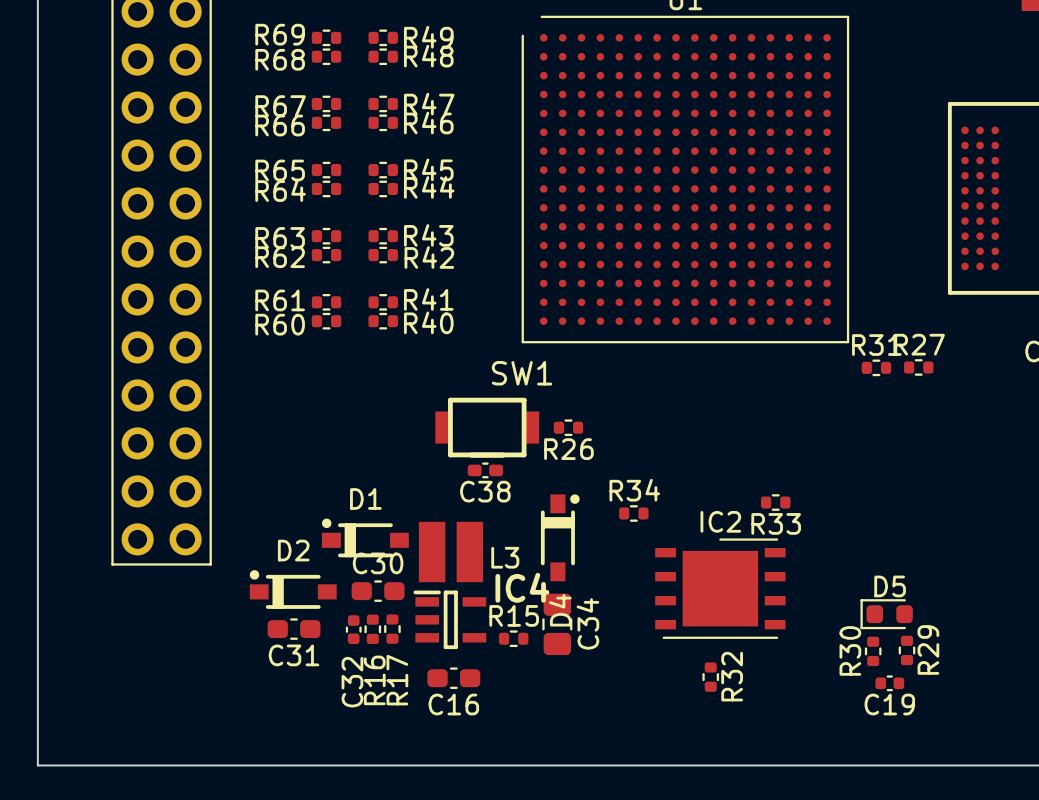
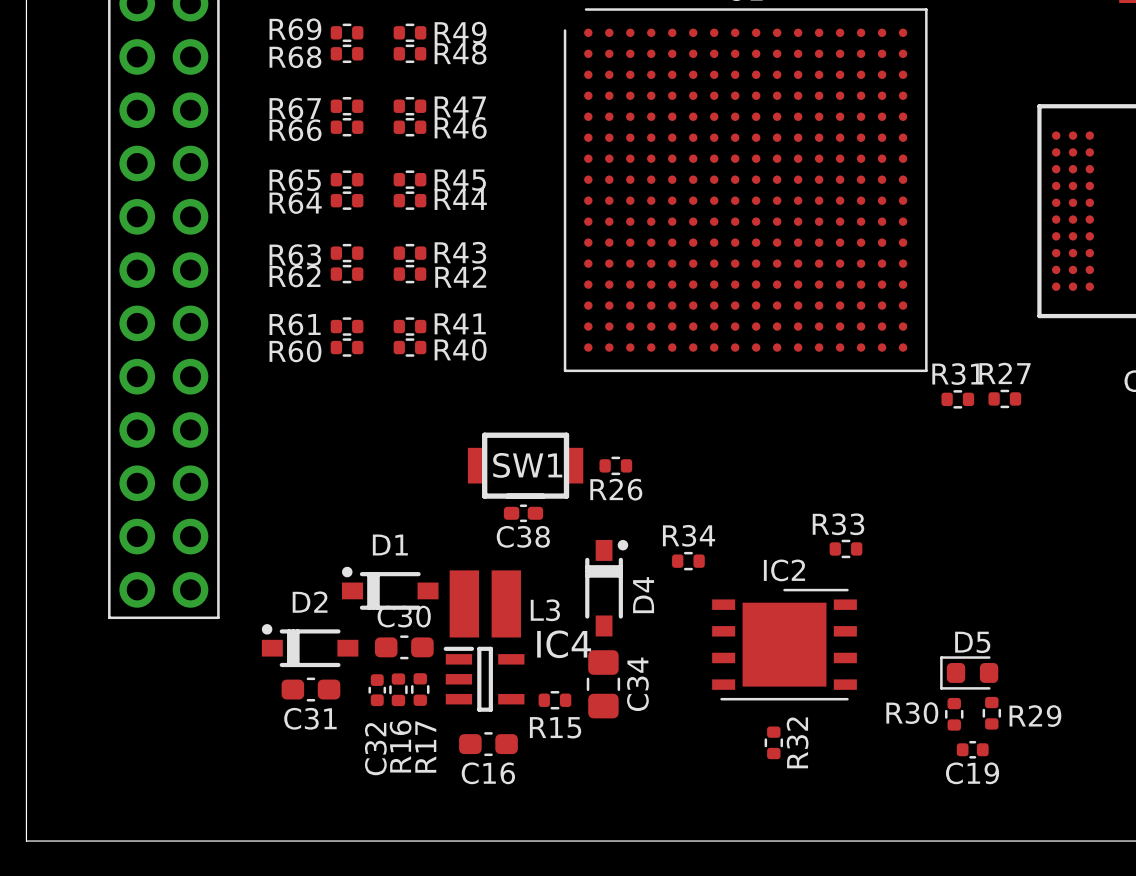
SW1 name position: SW1 (522, 373) -> SW1 (527, 465)
R33 name position: R33 (776, 523) -> R33 (838, 524)
D4 name position: D4 (560, 610) -> D4 (643, 595)
R15 name position: R15 (514, 615) -> R15 (555, 727)
R29 name rotation: 0° (928, 649) -> 90° clockwise (1035, 716)
R30 name rotation: 0° (850, 650) -> 90° clockwise (912, 713)

